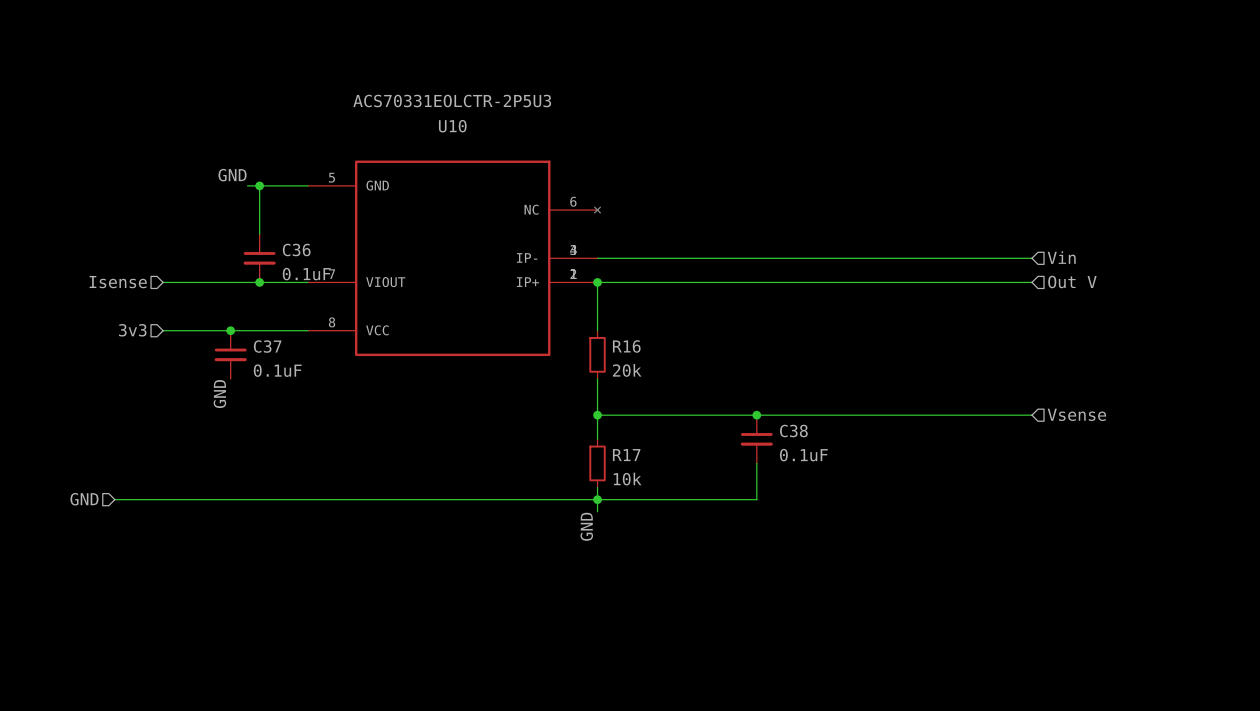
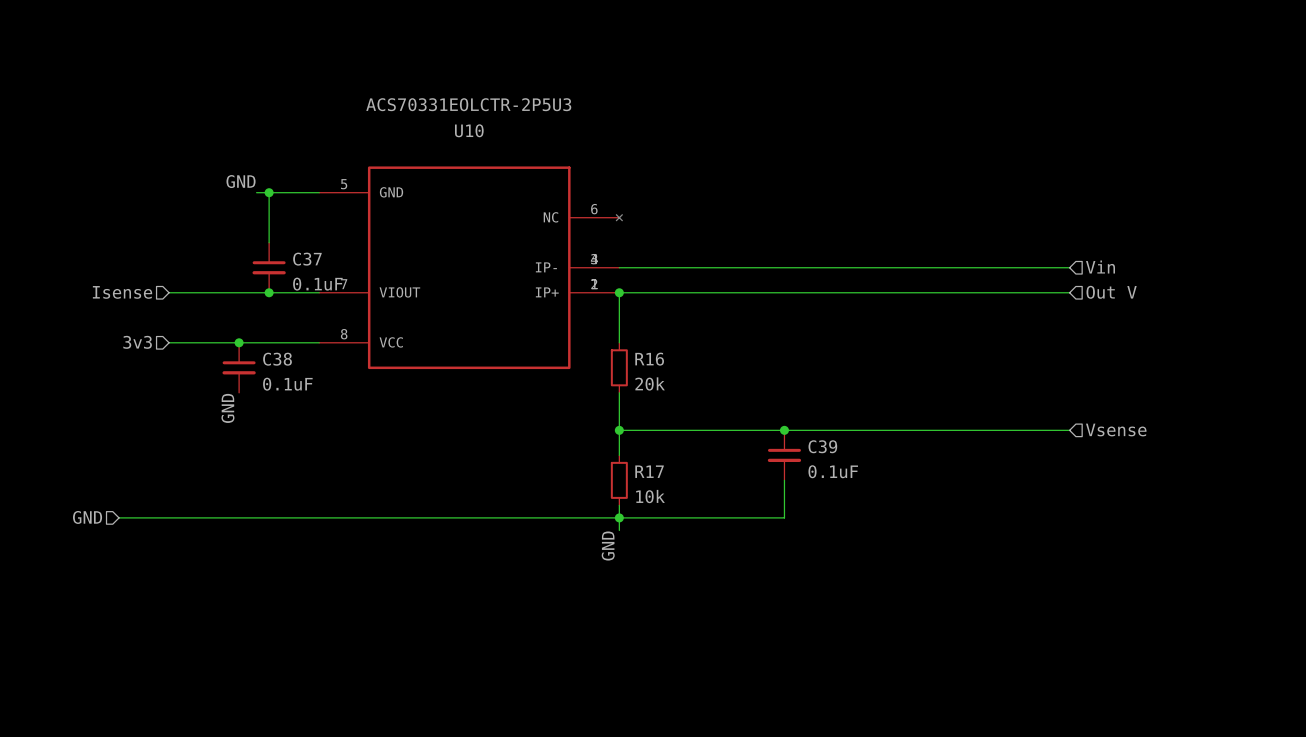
C36 name: C36 (296, 250) -> C37 (307, 259)
C37 name: C37 (267, 346) -> C38 (277, 359)
C38 name: C38 (793, 431) -> C39 (822, 446)

